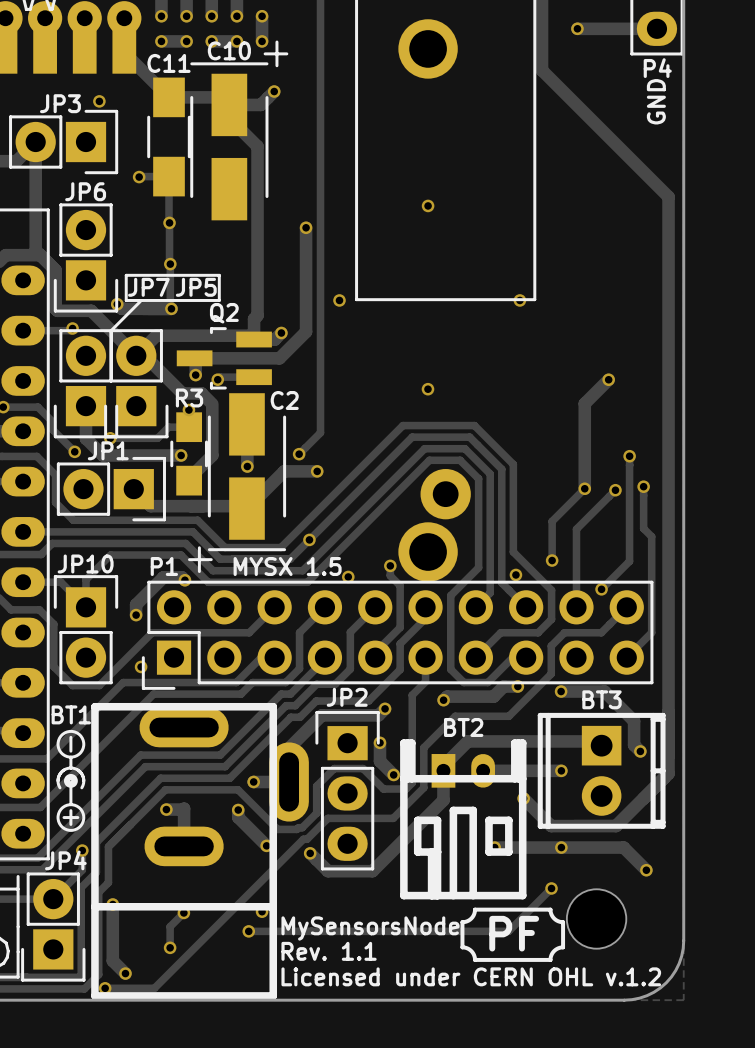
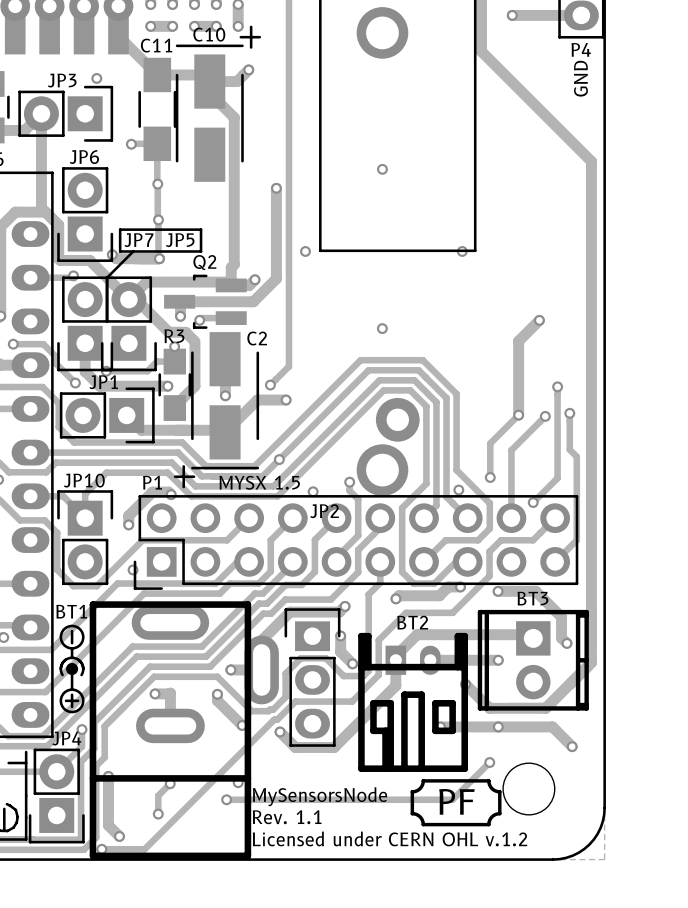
JP2 name position: JP2 (347, 697) -> JP2 (324, 511)

